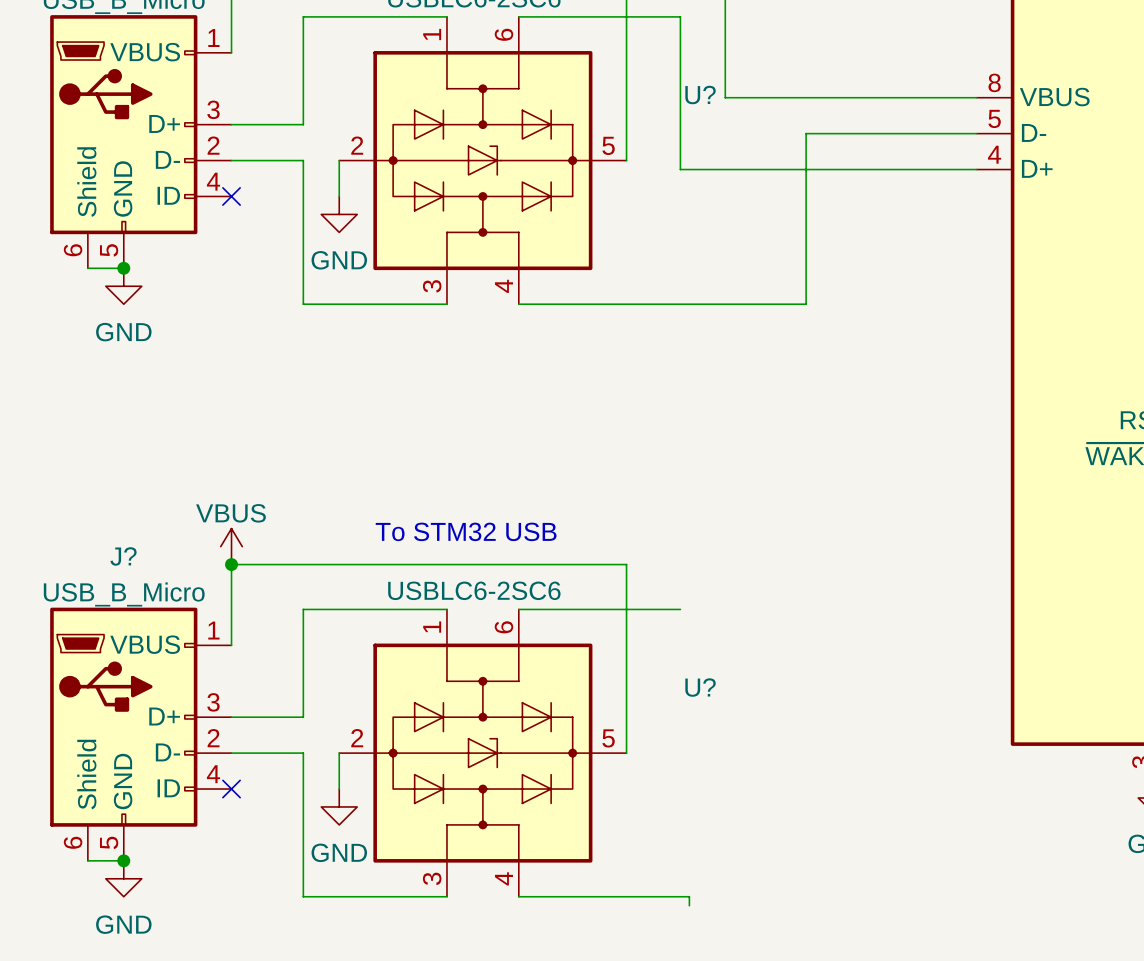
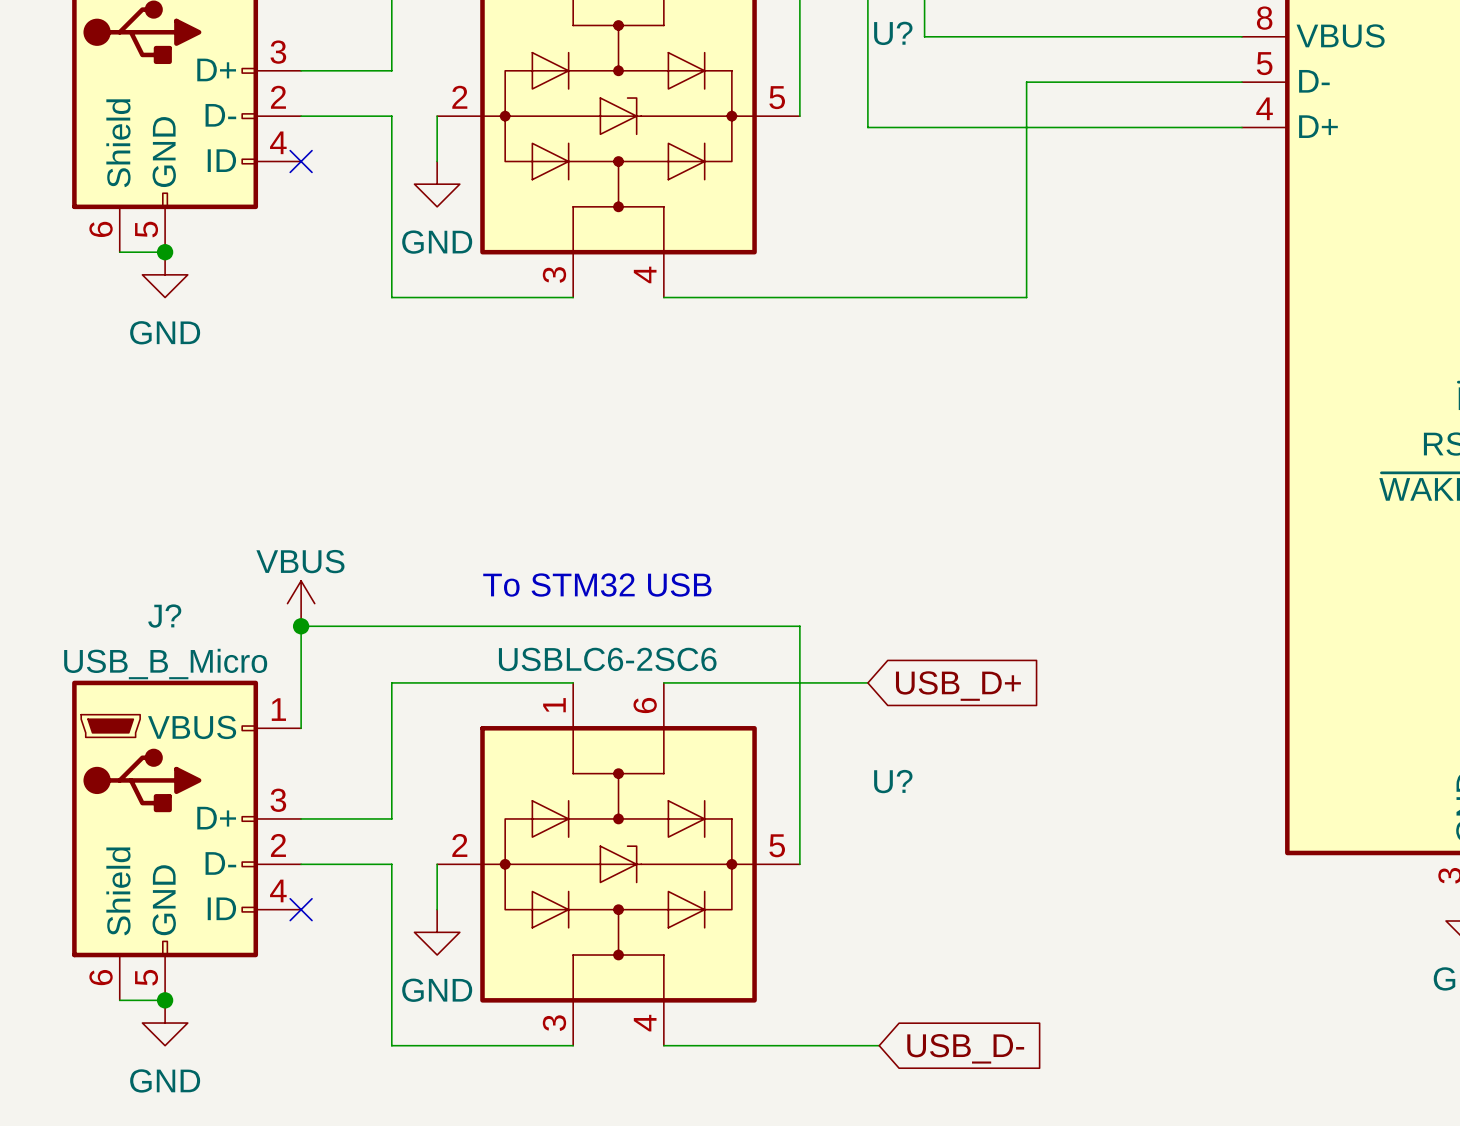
global label: none -> USB_D+ (958, 686)
wire: (689, 896) (689, 905) -> none
global label: none -> USB_D- (965, 1048)

